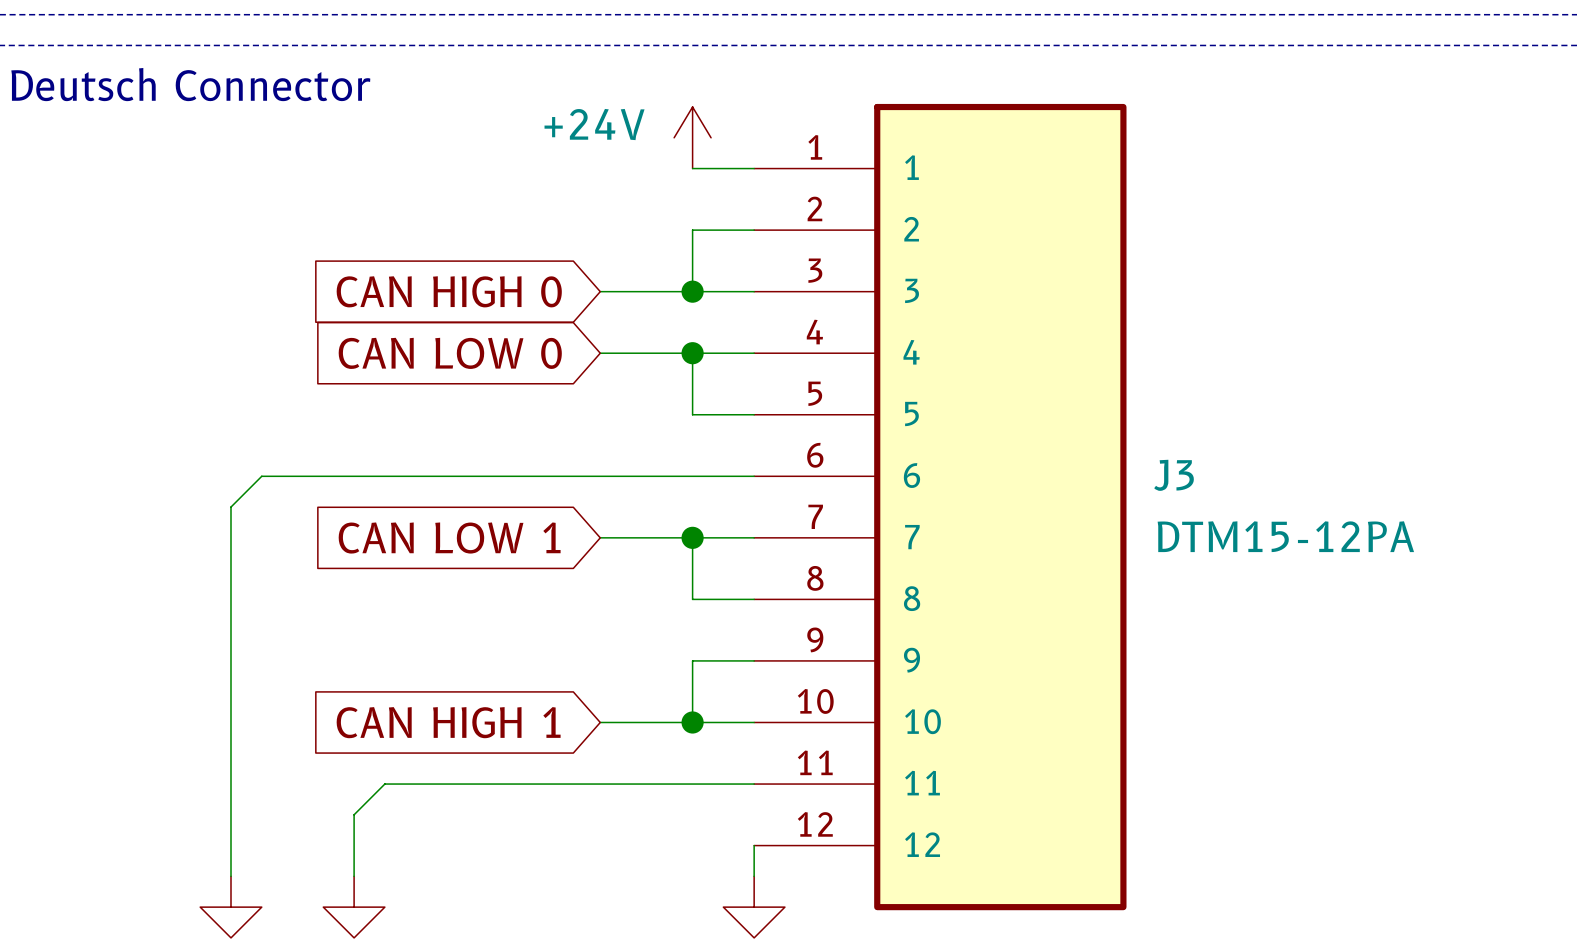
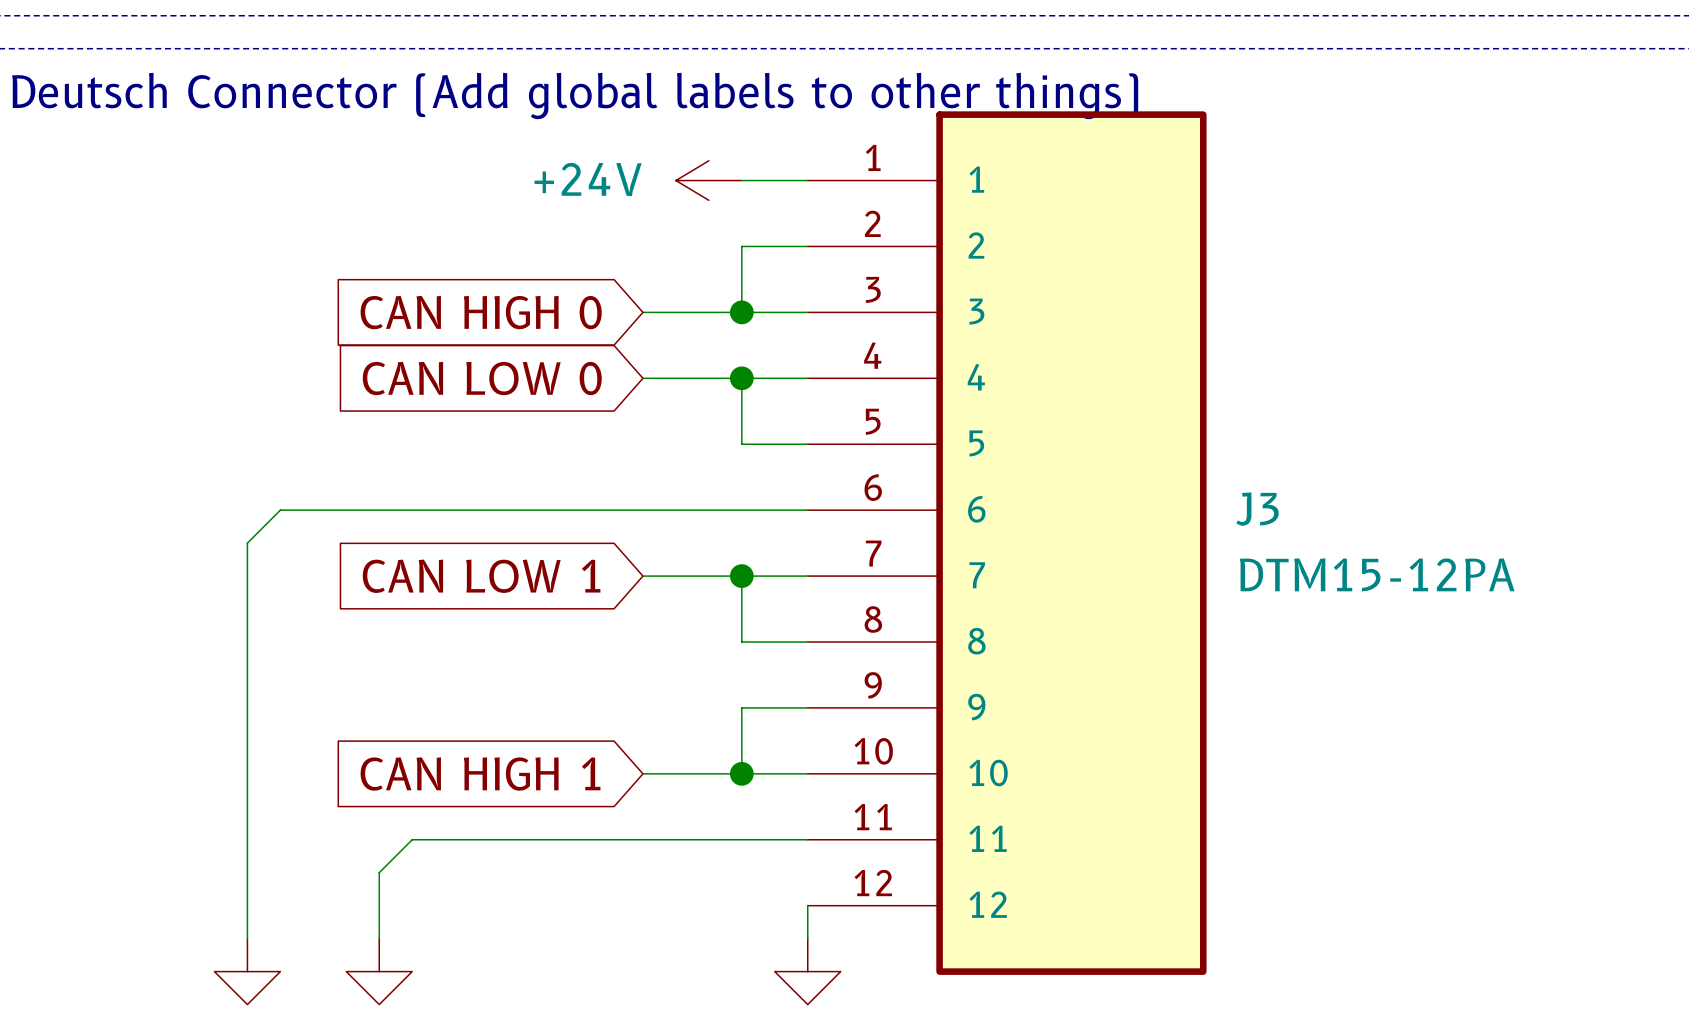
text: Deutsch Connector (190, 84) -> Deutsch Connector (Add global labels to other things) (575, 95)
power symbol rotation: 0° (692, 137) -> 90° counterclockwise (708, 180)
power symbol position: +24V (692, 137) -> +24V (708, 180)

